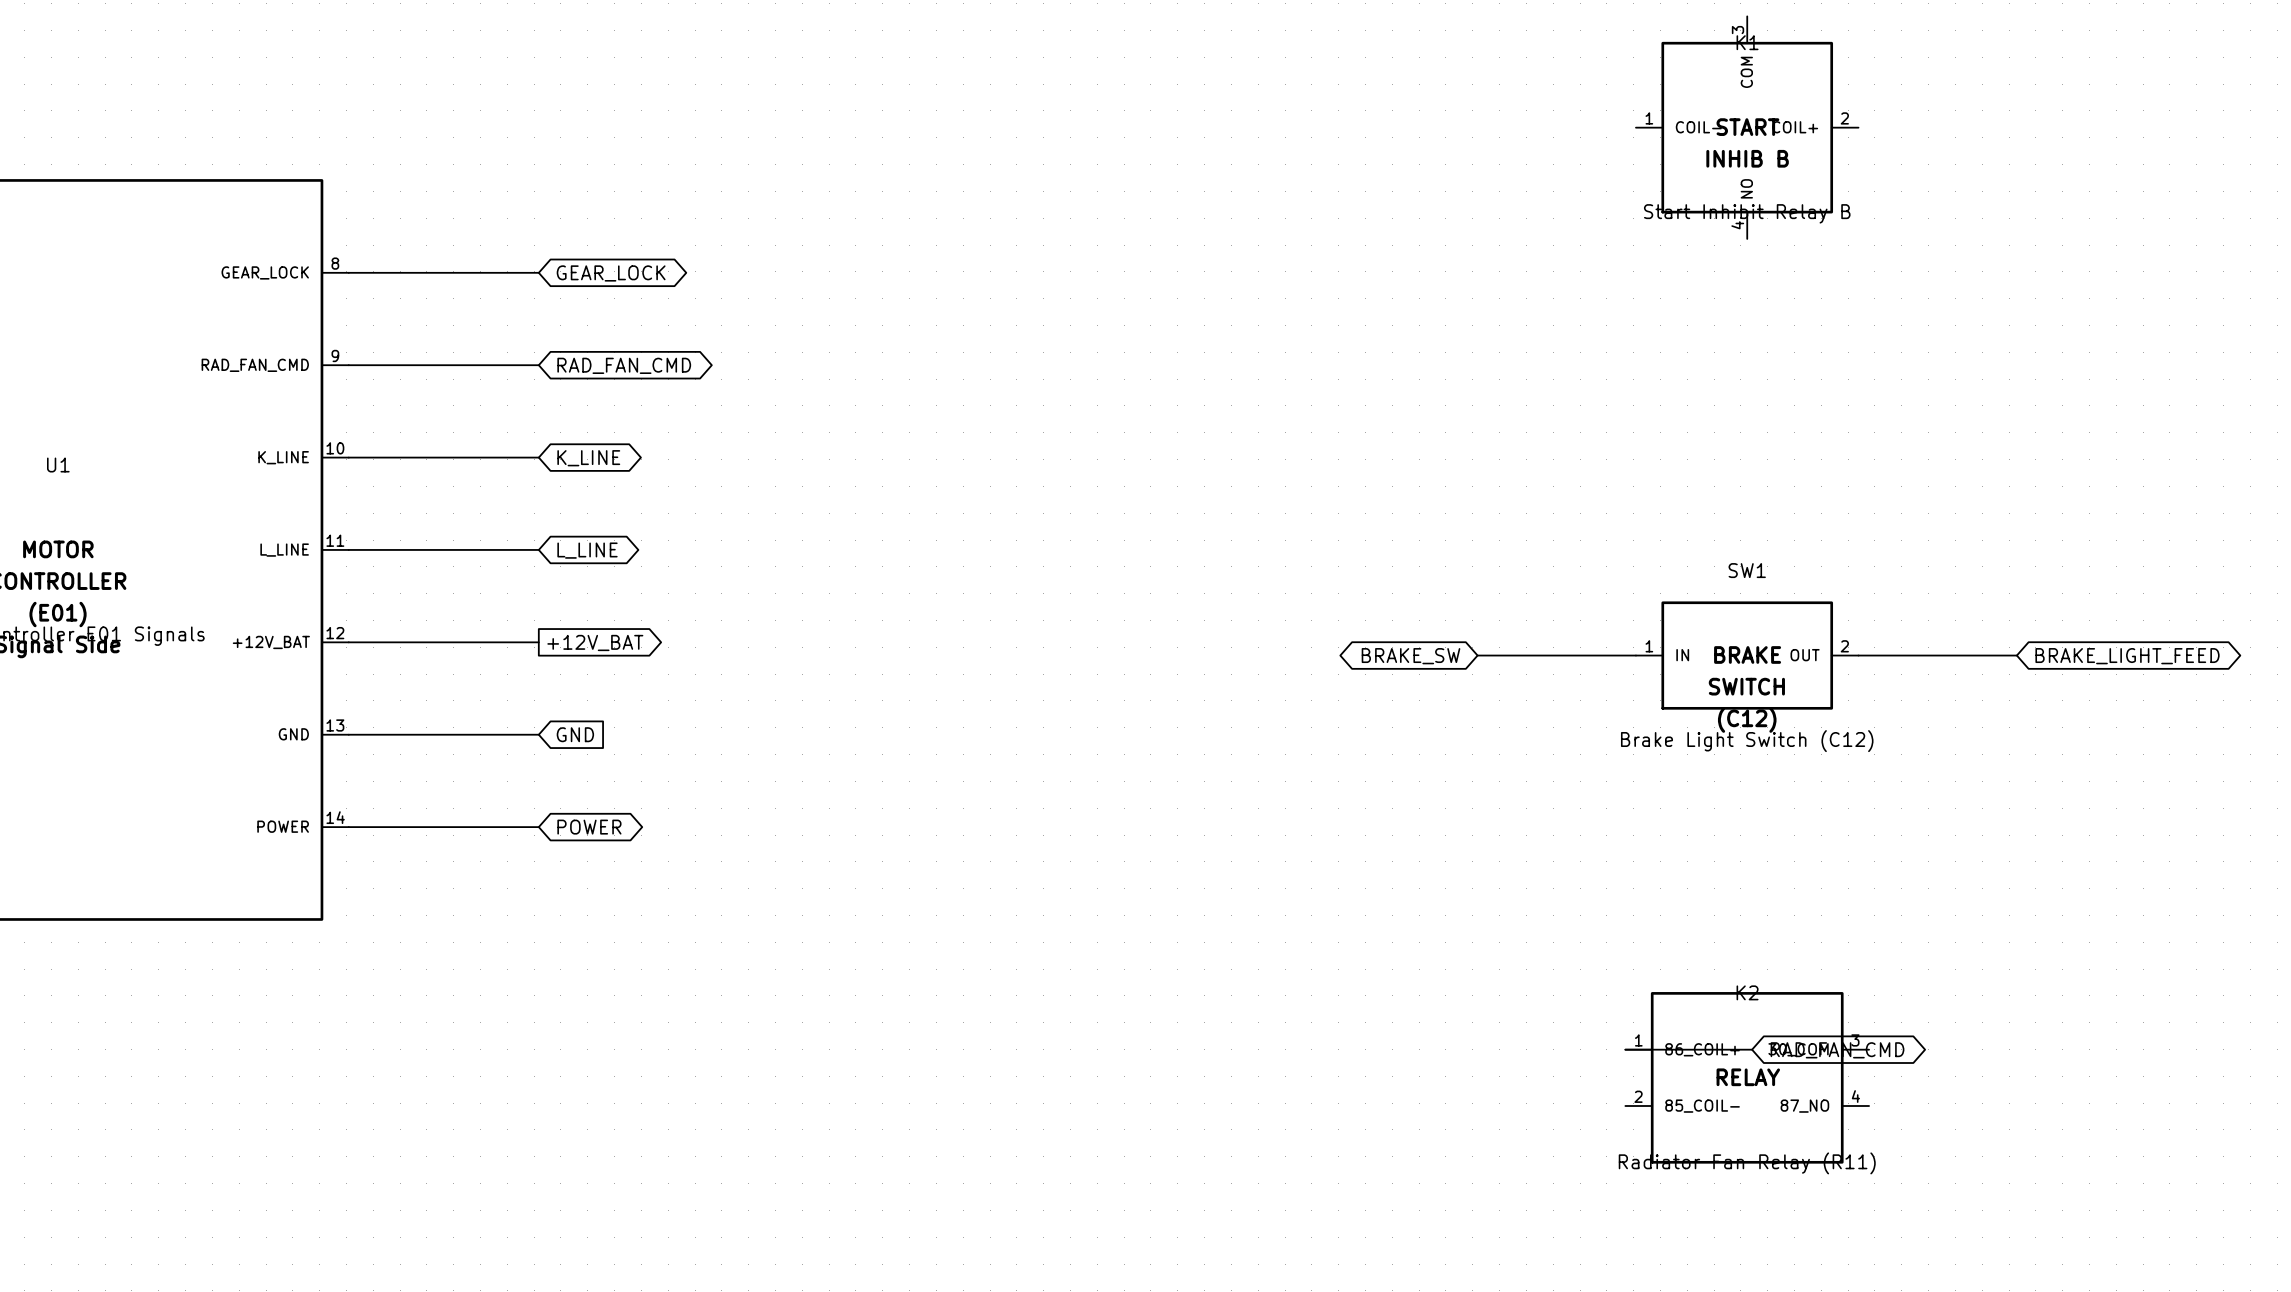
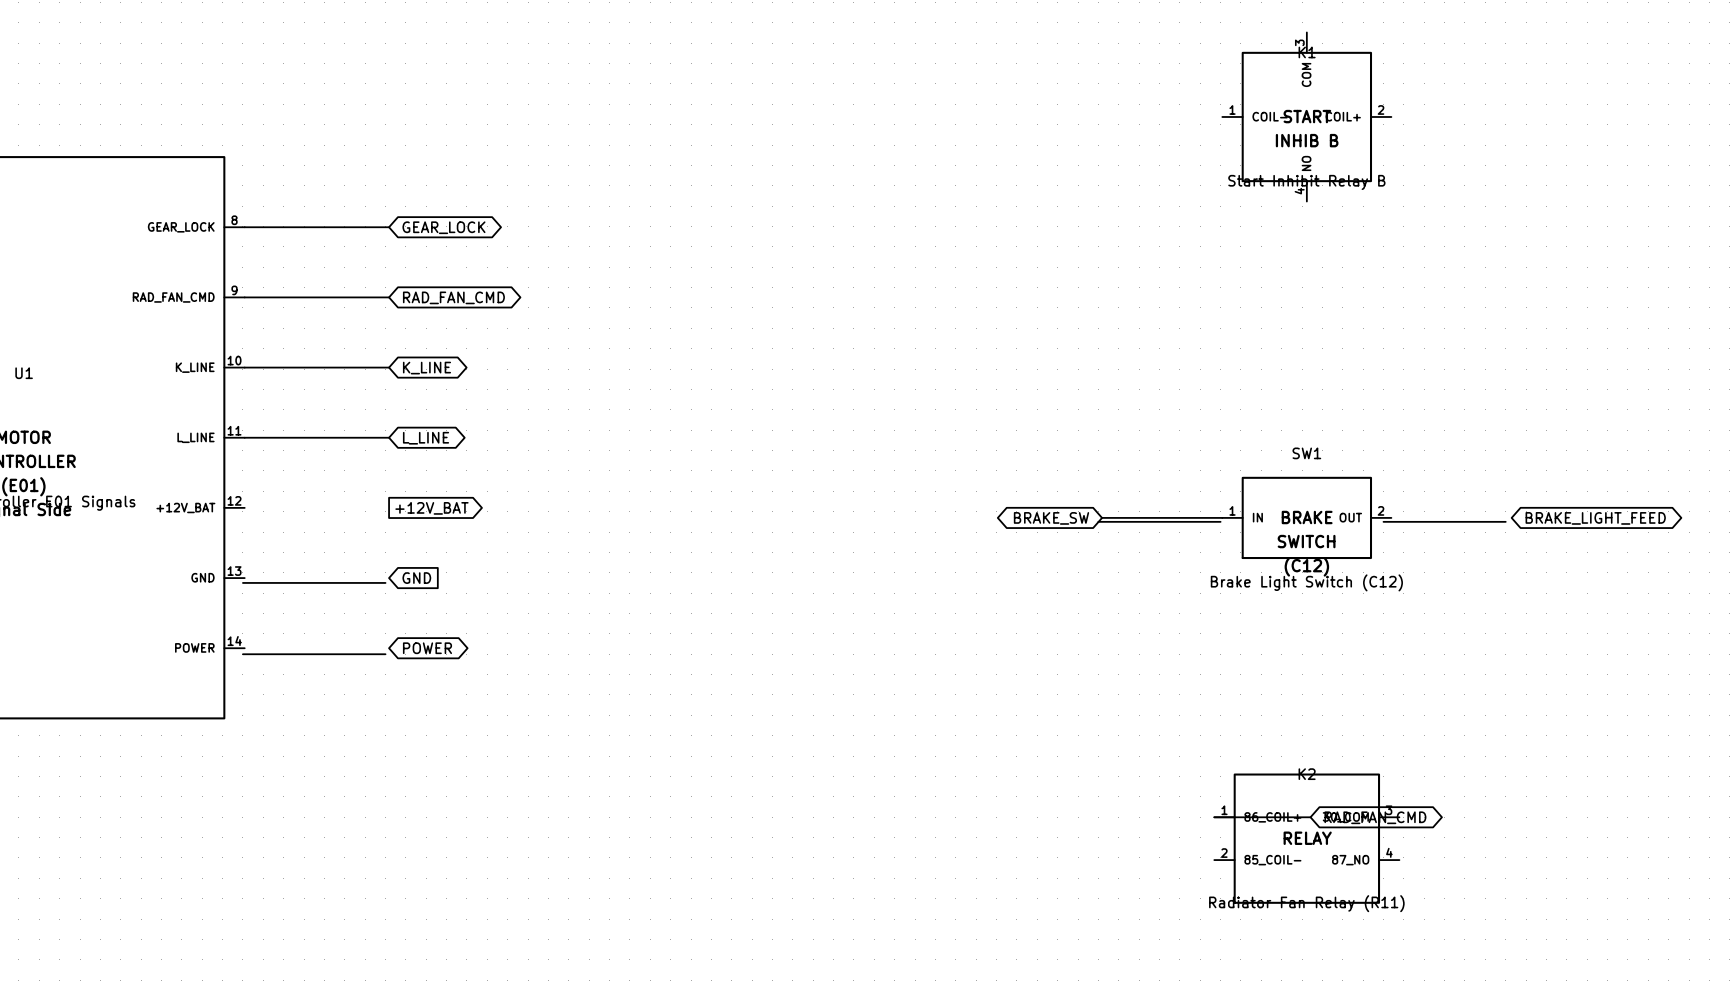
wire: (348, 642) (538, 642) -> none
wire: (1858, 655) (2016, 655) -> none
wire: none -> (1098, 521) (1220, 521)
wire: none -> (1383, 521) (1505, 521)
wire: (348, 734) (538, 734) -> none
wire: none -> (242, 582) (385, 582)
wire: (348, 827) (538, 827) -> none
wire: none -> (242, 654) (385, 654)

